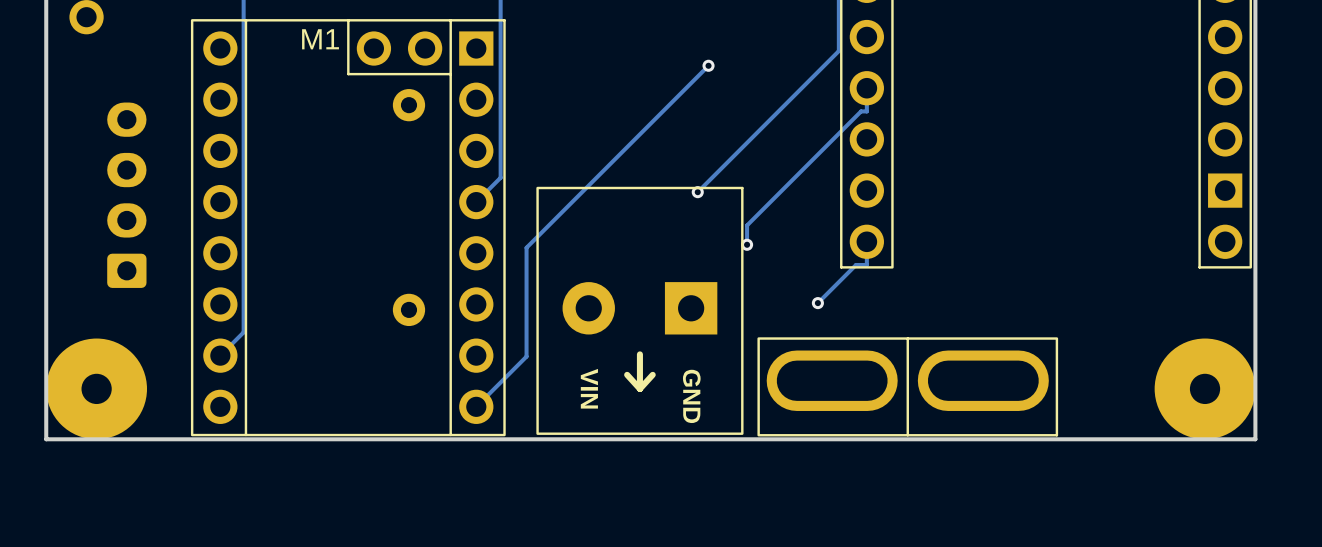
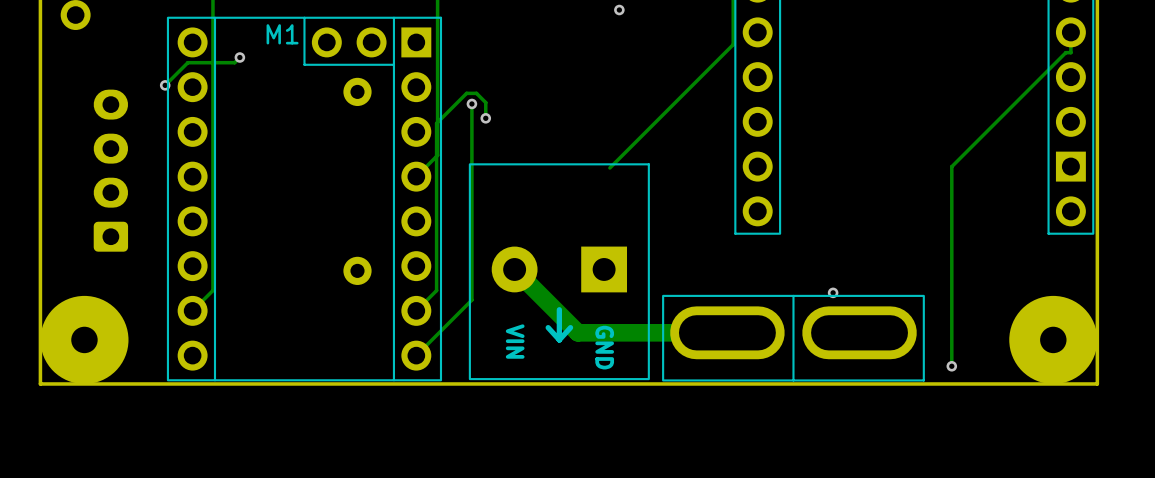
track: none -> (1070, 32) (1070, 52) (1065, 52) (951, 166) (951, 366)
track: none -> (239, 57) (234, 62) (187, 62) (165, 85)
via: none -> (239, 57)
track: (708, 65) (526, 247) (526, 356) -> (471, 103) (471, 300) (460, 311)
via position: (708, 65) -> (619, 10)
track: (866, 88) (866, 111) (861, 111) (747, 225) (747, 244) -> none
via: none -> (165, 85)
via: none -> (471, 103)
track: none -> (485, 118) (485, 102) (476, 93) (466, 93) (436, 123) (436, 290) (416, 310)
via: none -> (485, 118)
via: (697, 192) -> none
track: (866, 241) (866, 265) (856, 265) (817, 303) -> none
via: (747, 244) -> none
via: (817, 303) -> none
track: none -> (514, 269) (577, 332) (727, 332)
via: none -> (833, 292)
via: none -> (951, 366)

